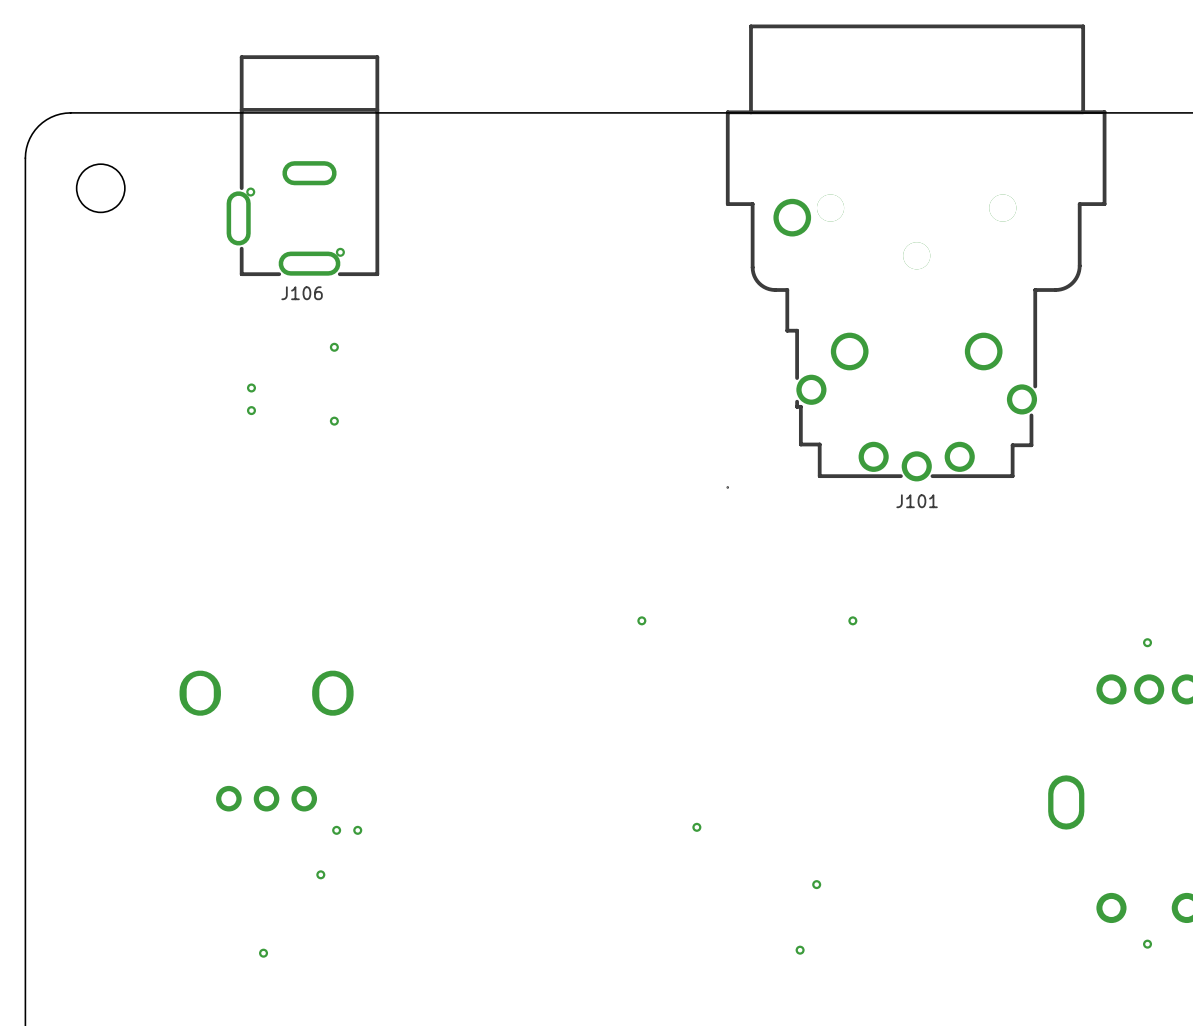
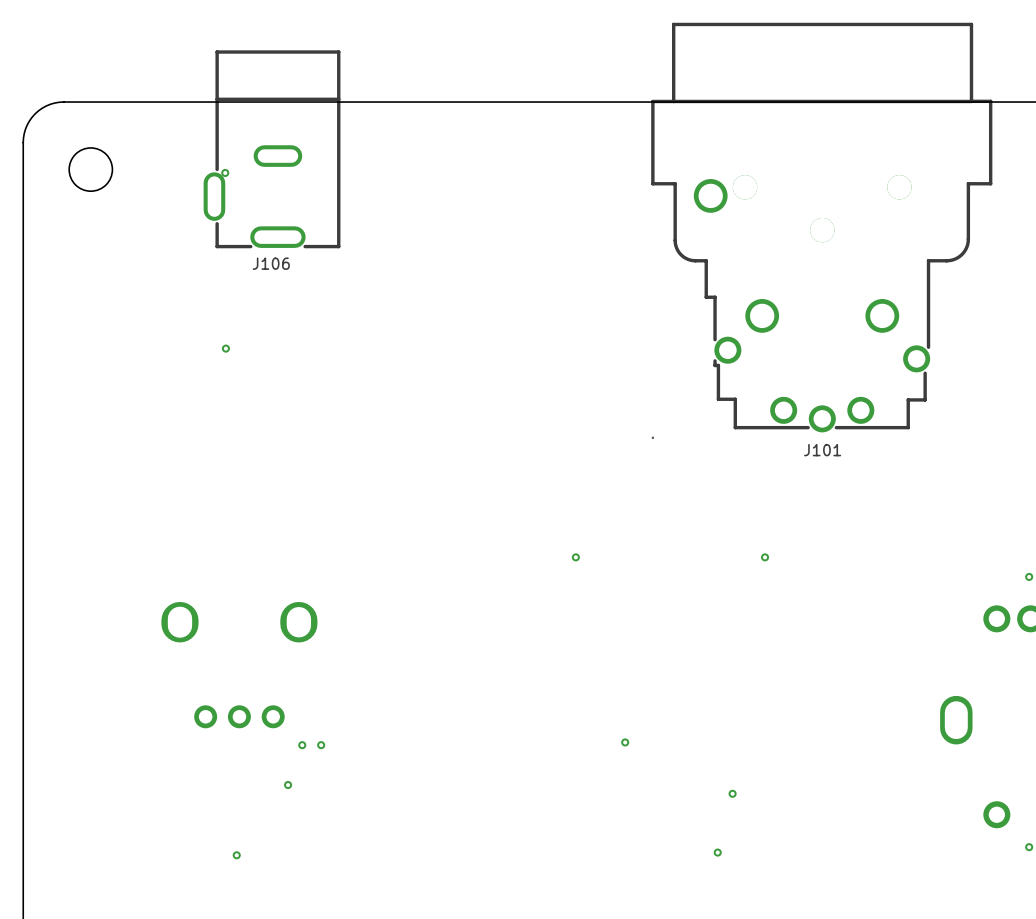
via: (340, 252) -> none
via: (334, 347) -> none
via: (251, 410) -> none
via: (334, 421) -> none

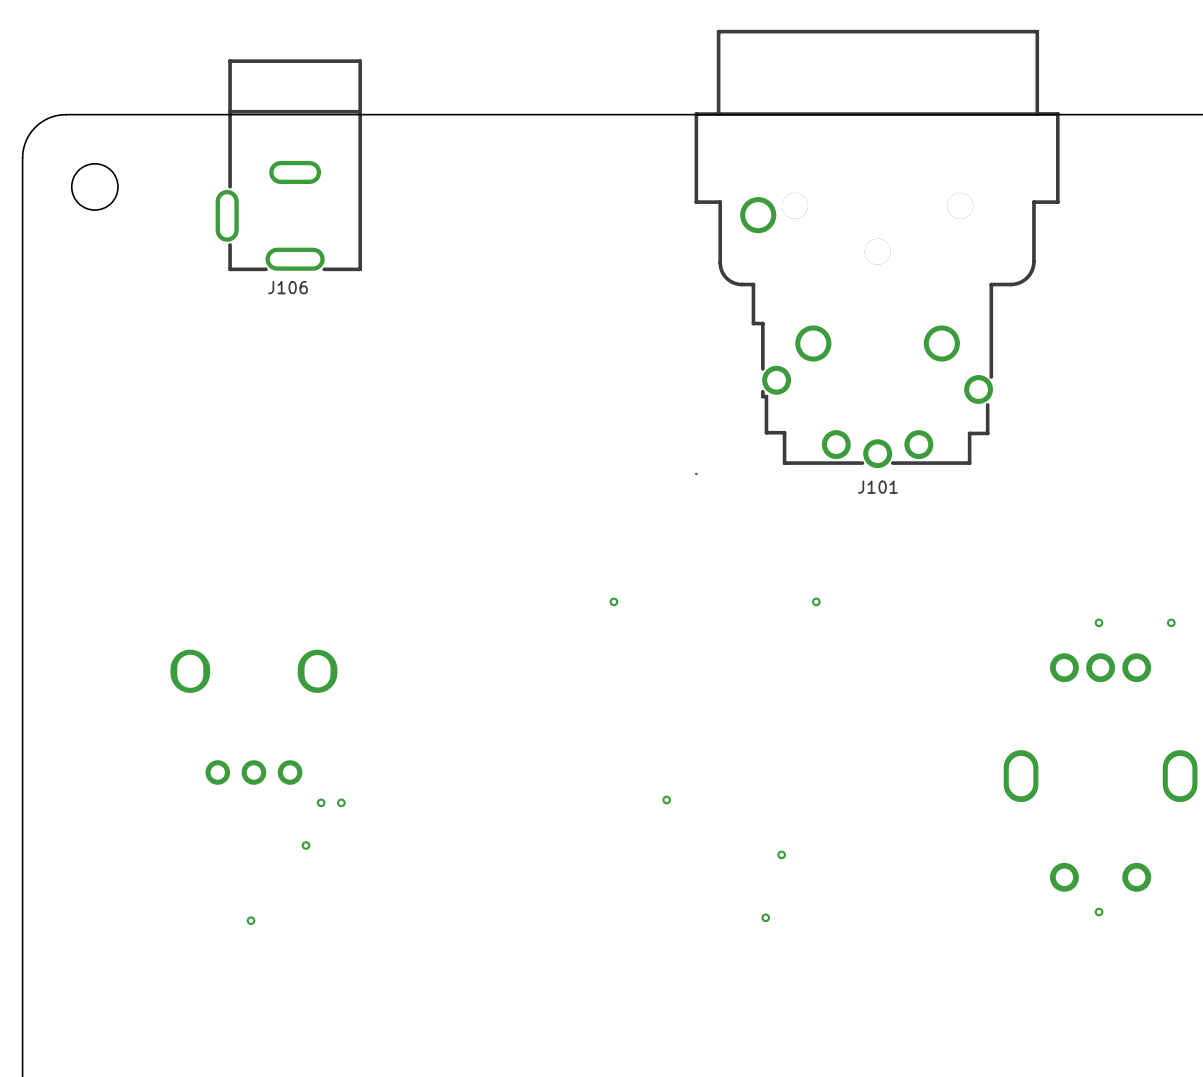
via: (225, 172) -> none
via: (225, 348) -> none

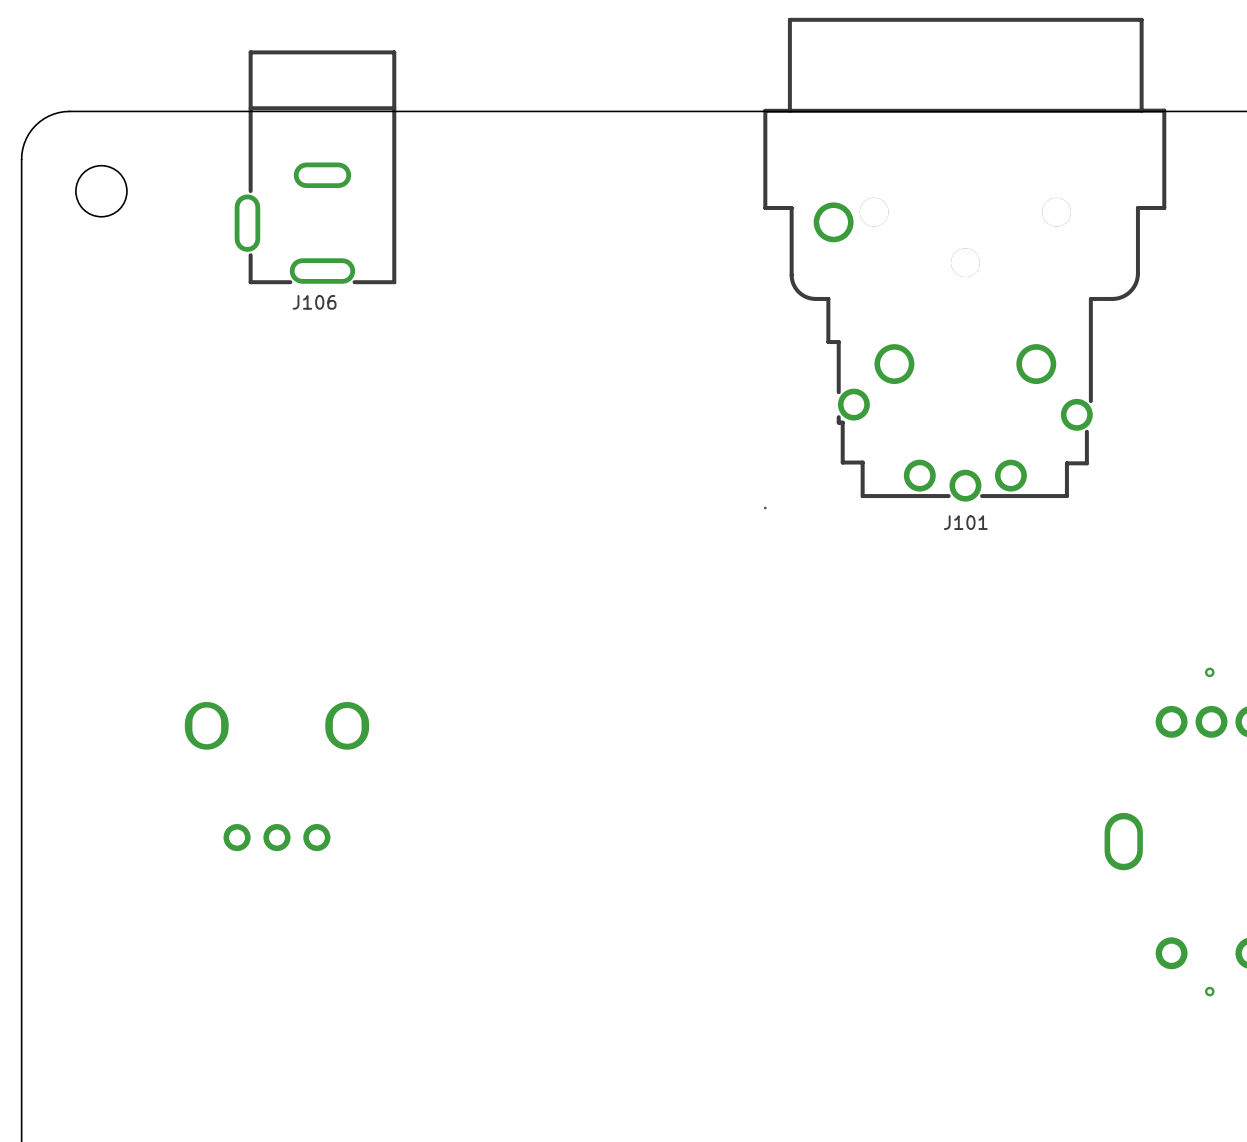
via: (613, 601) -> none
via: (816, 601) -> none
via: (666, 799) -> none
via: (321, 802) -> none
via: (341, 802) -> none
via: (305, 845) -> none
via: (781, 854) -> none
via: (765, 917) -> none
via: (251, 920) -> none

